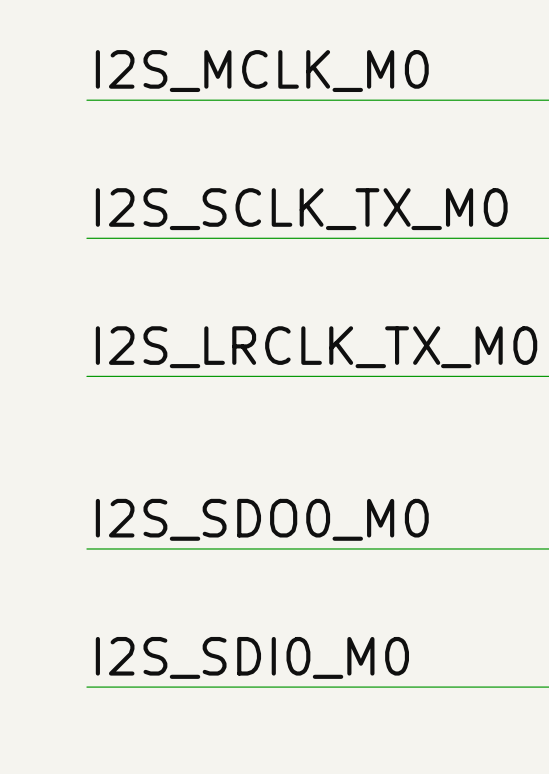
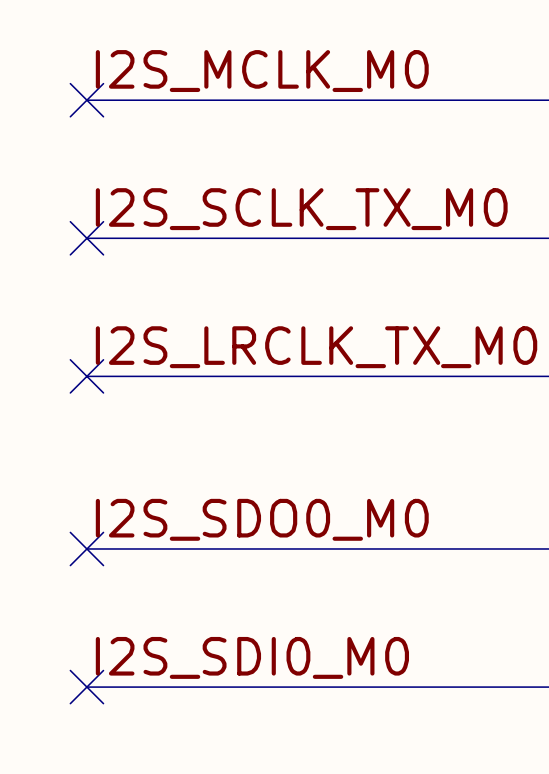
no-connect mark: none -> (86, 100)
no-connect mark: none -> (86, 238)
no-connect mark: none -> (86, 376)
no-connect mark: none -> (86, 548)
no-connect mark: none -> (86, 687)

